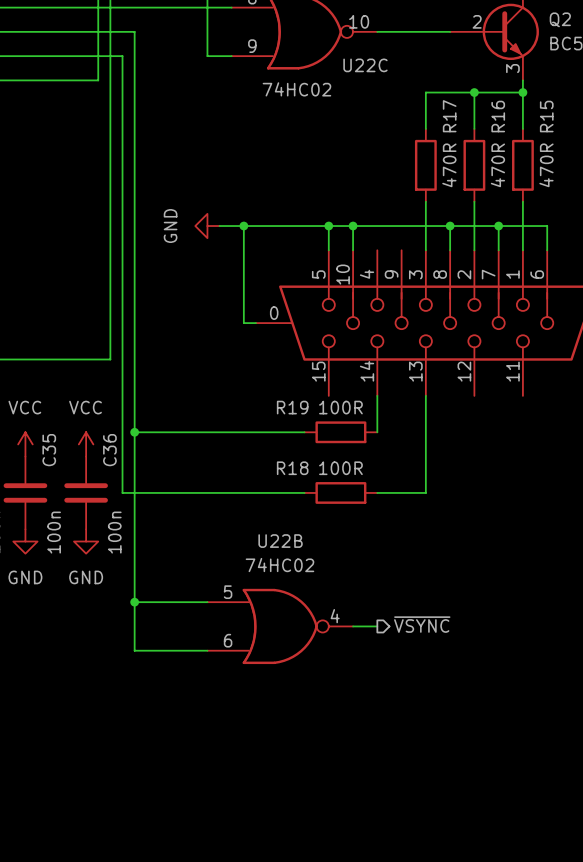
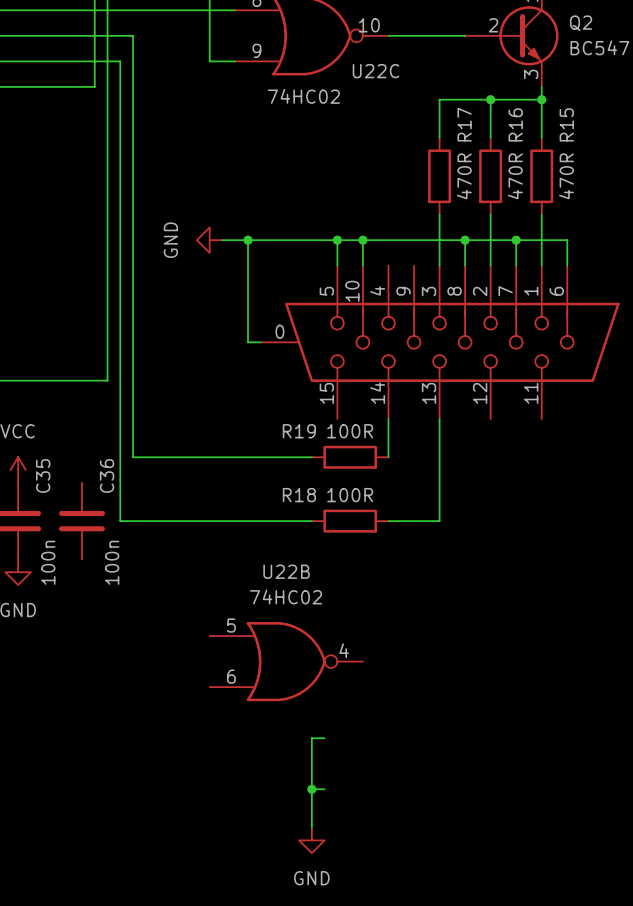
wire: (134, 432) (134, 650) (207, 650) -> none
junction: (134, 432) -> none
power symbol: VCC (86, 444) -> none
power symbol: GND (86, 541) -> none
wire: (134, 602) (207, 602) -> none
junction: (134, 602) -> none
hierarchical label: ~{VSYNC} (422, 624) -> none
wire: (353, 626) (377, 626) -> none
wire: none -> (324, 738) (311, 738) (311, 827)
wire: none -> (311, 789) (324, 789)
junction: none -> (311, 789)
power symbol: none -> GND (311, 840)

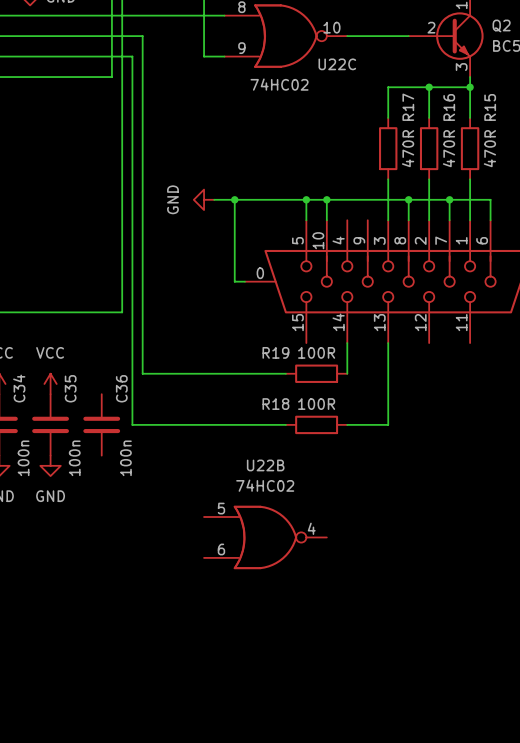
wire: (324, 738) (311, 738) (311, 827) -> none
wire: (311, 789) (324, 789) -> none
junction: (311, 789) -> none
power symbol: GND (311, 840) -> none

